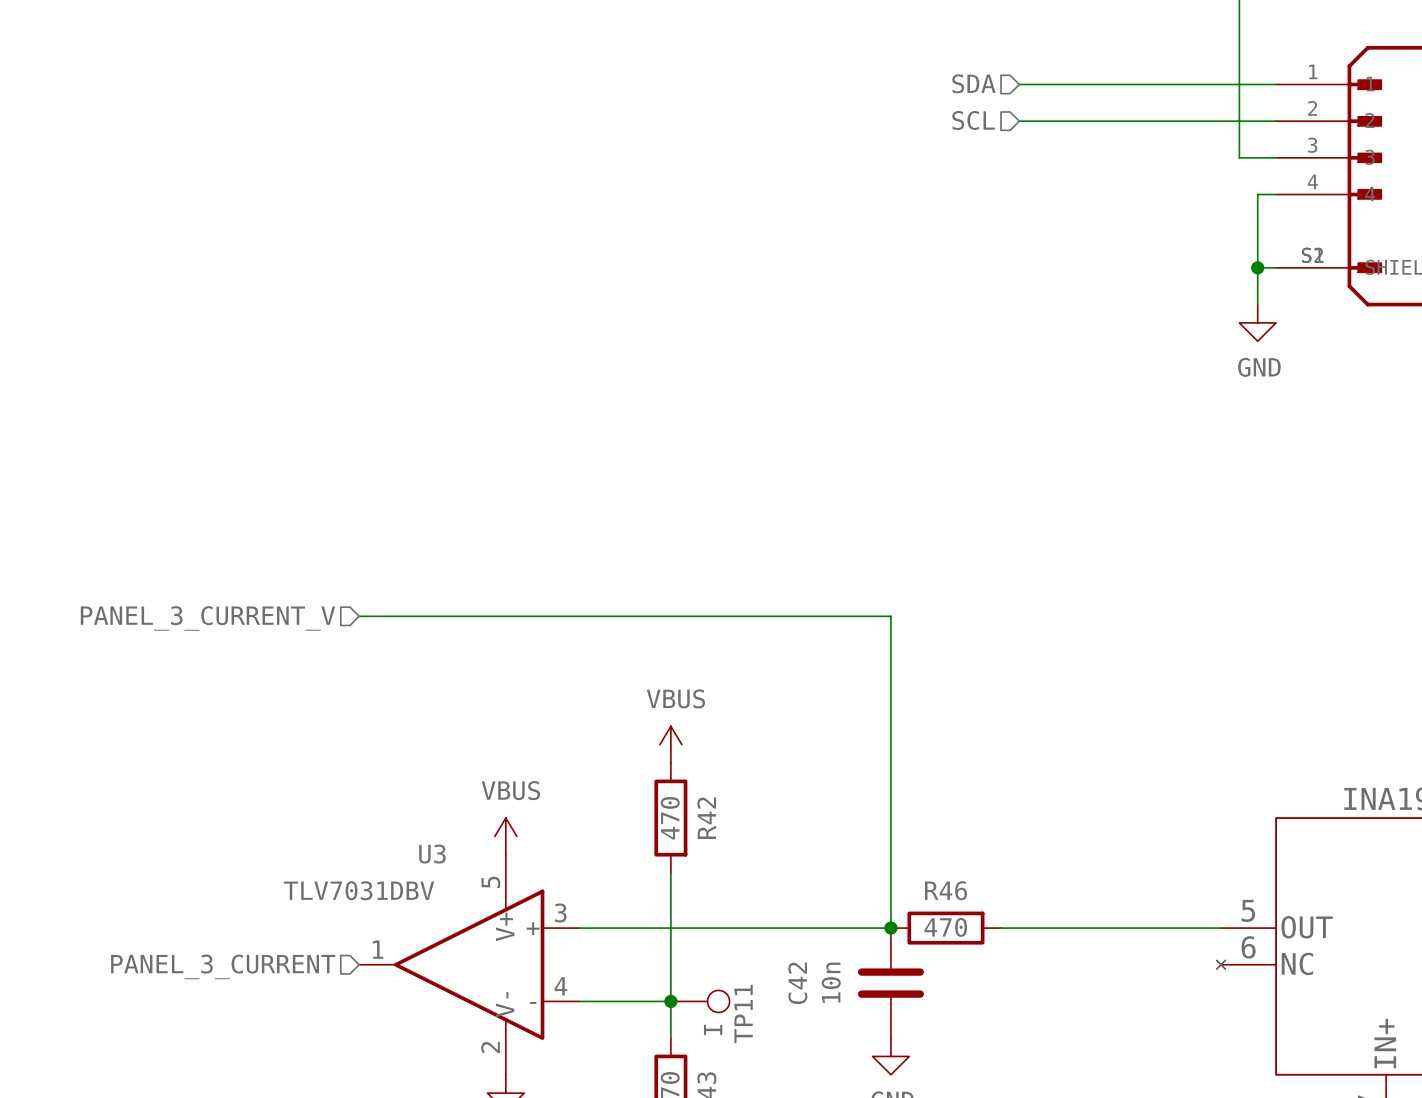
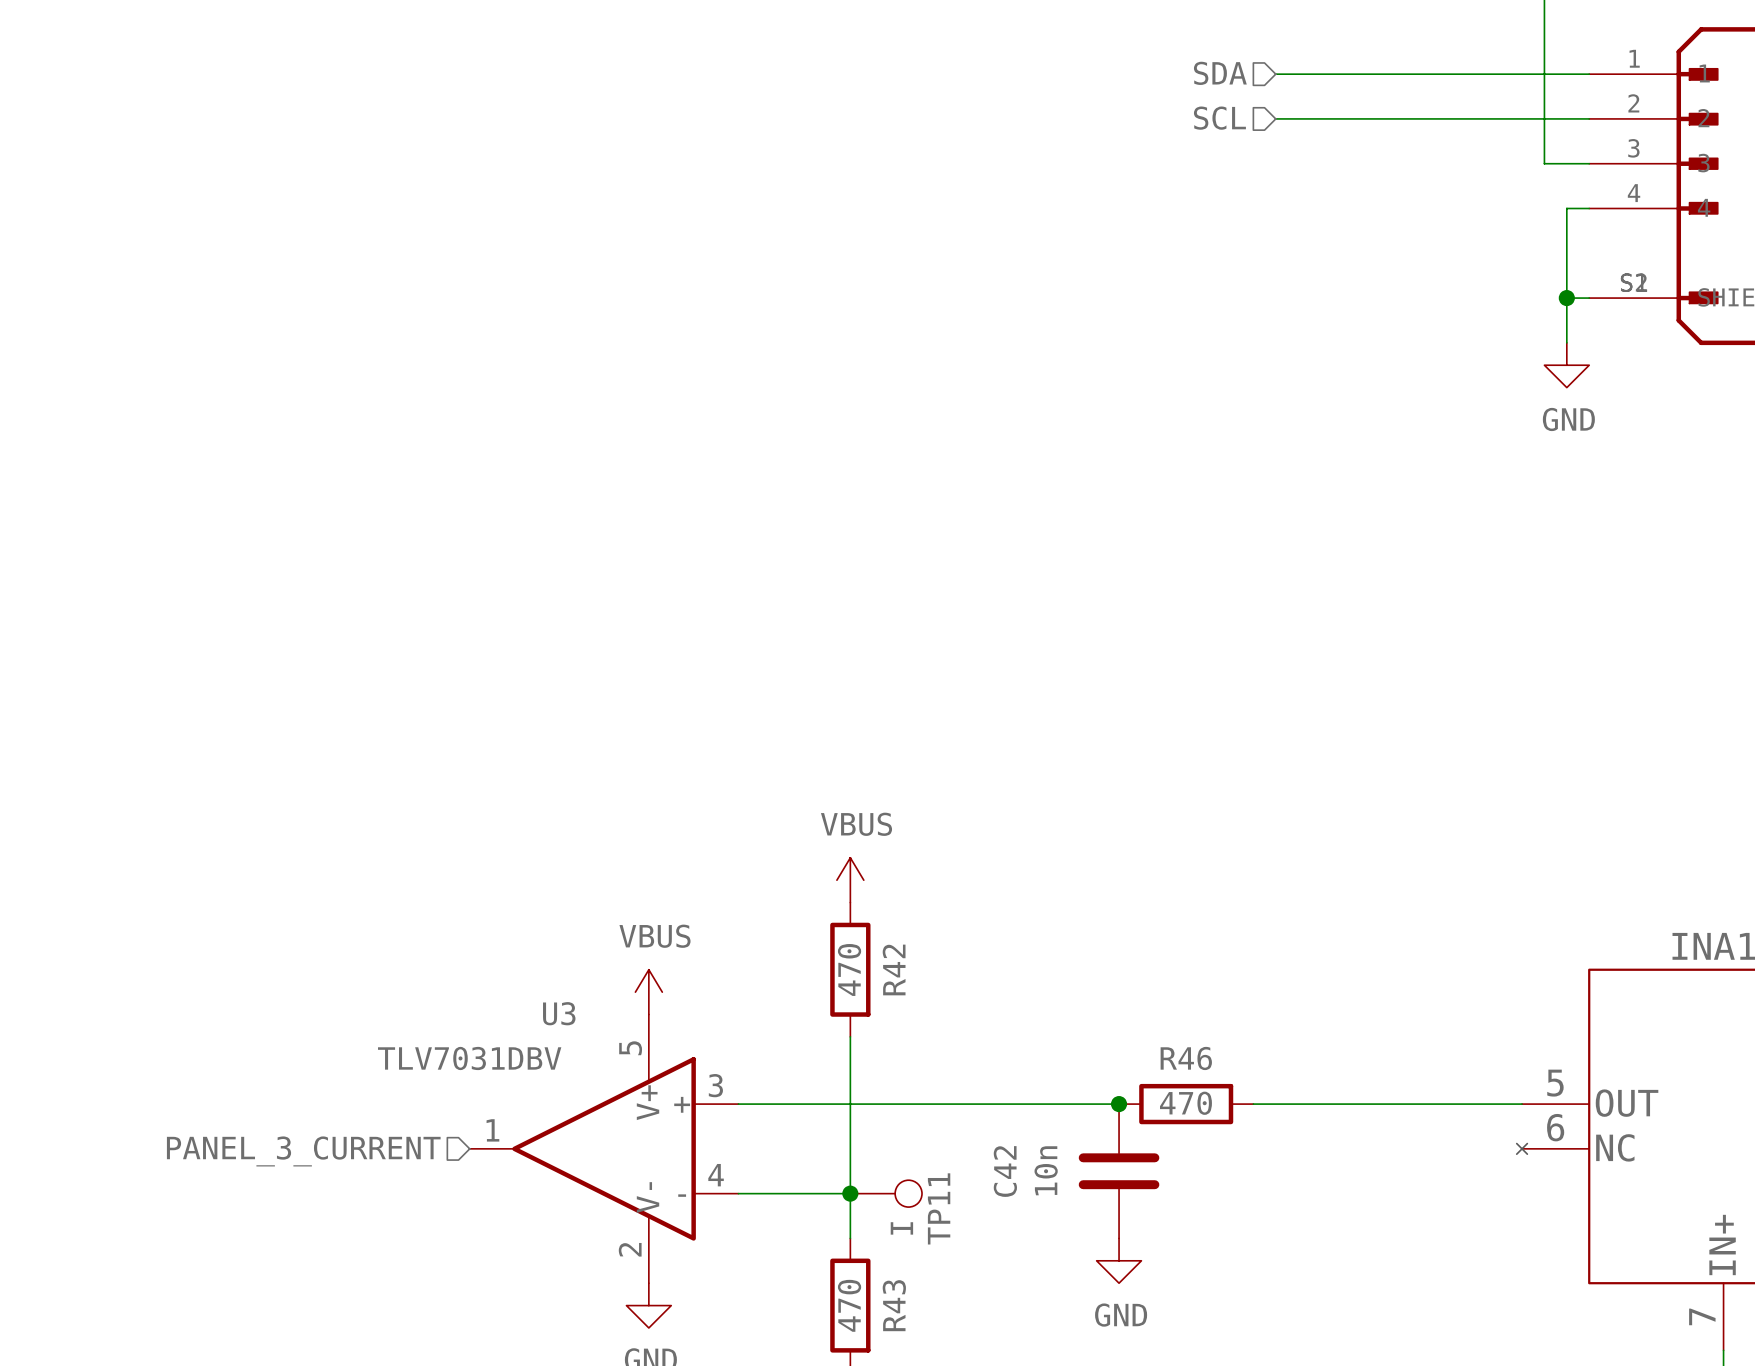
wire: (359, 616) (890, 616) (890, 928) -> none
hierarchical label: PANEL_3_CURRENT_V (207, 618) -> none

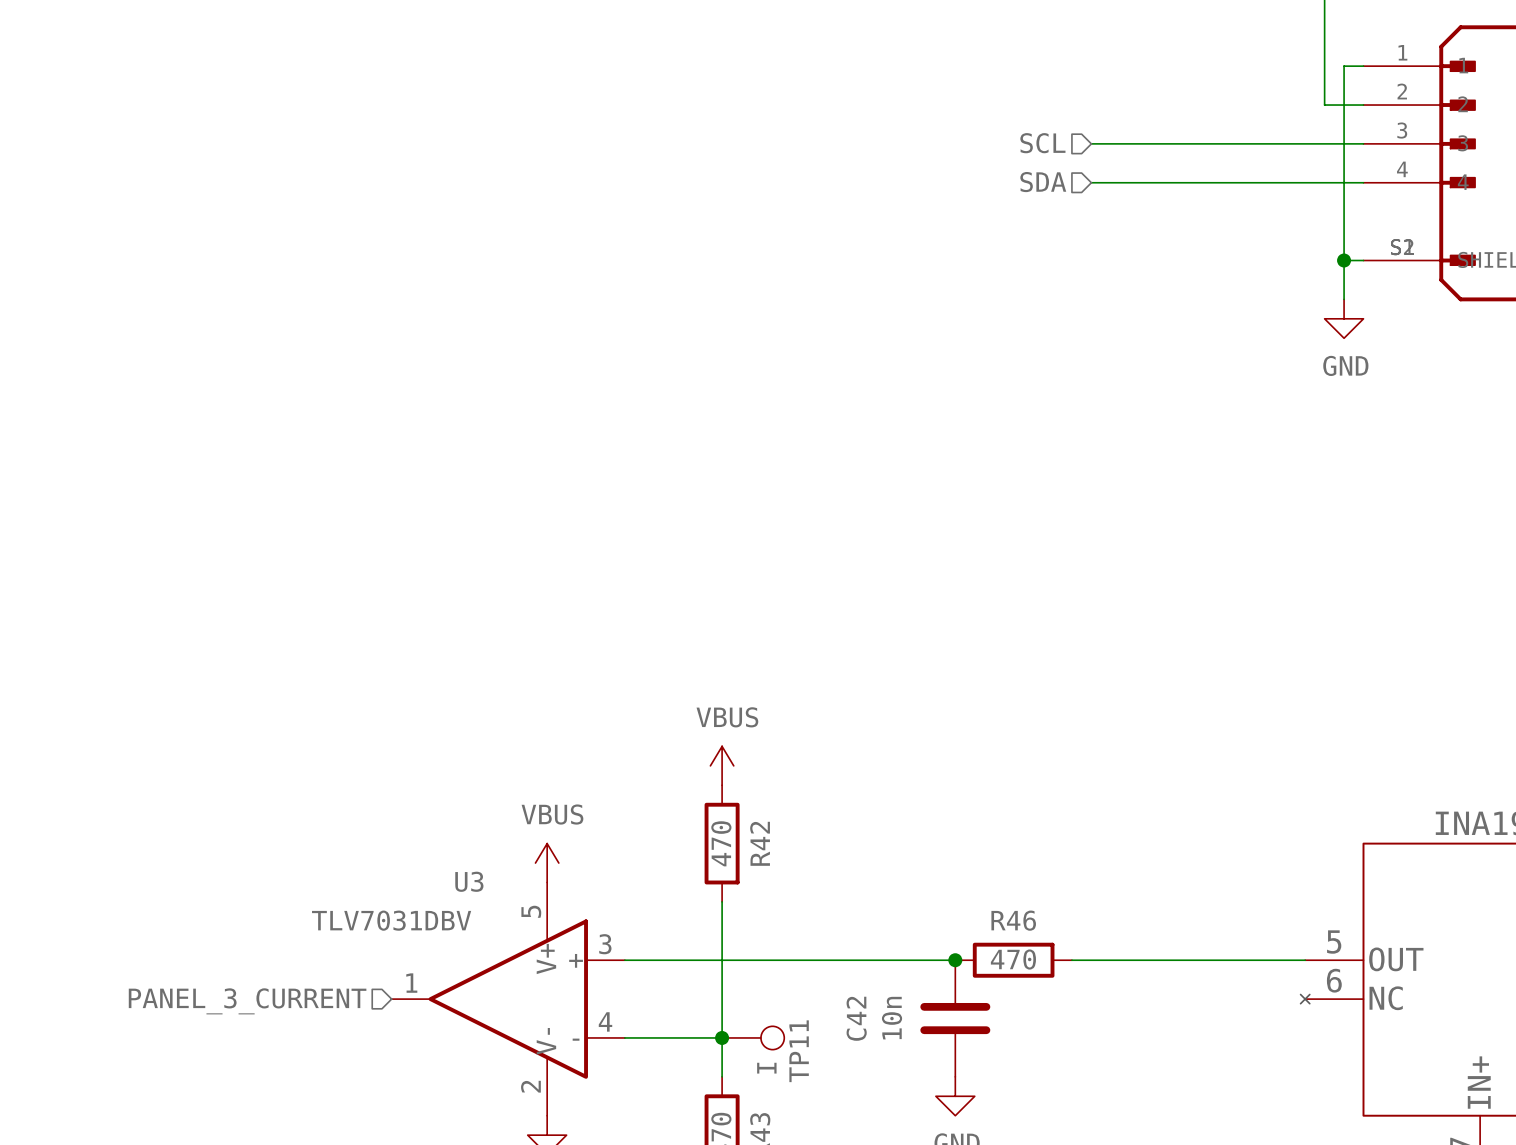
hierarchical label position: SDA (1220, 73) -> SDA (1043, 182)
wire: (1275, 74) (1566, 74) -> (1091, 182) (1344, 182) (1344, 66)
hierarchical label position: SCL (1219, 118) -> SCL (1042, 143)
wire: (1275, 118) (1544, 118) (1544, 163) -> (1091, 143) (1324, 143)

